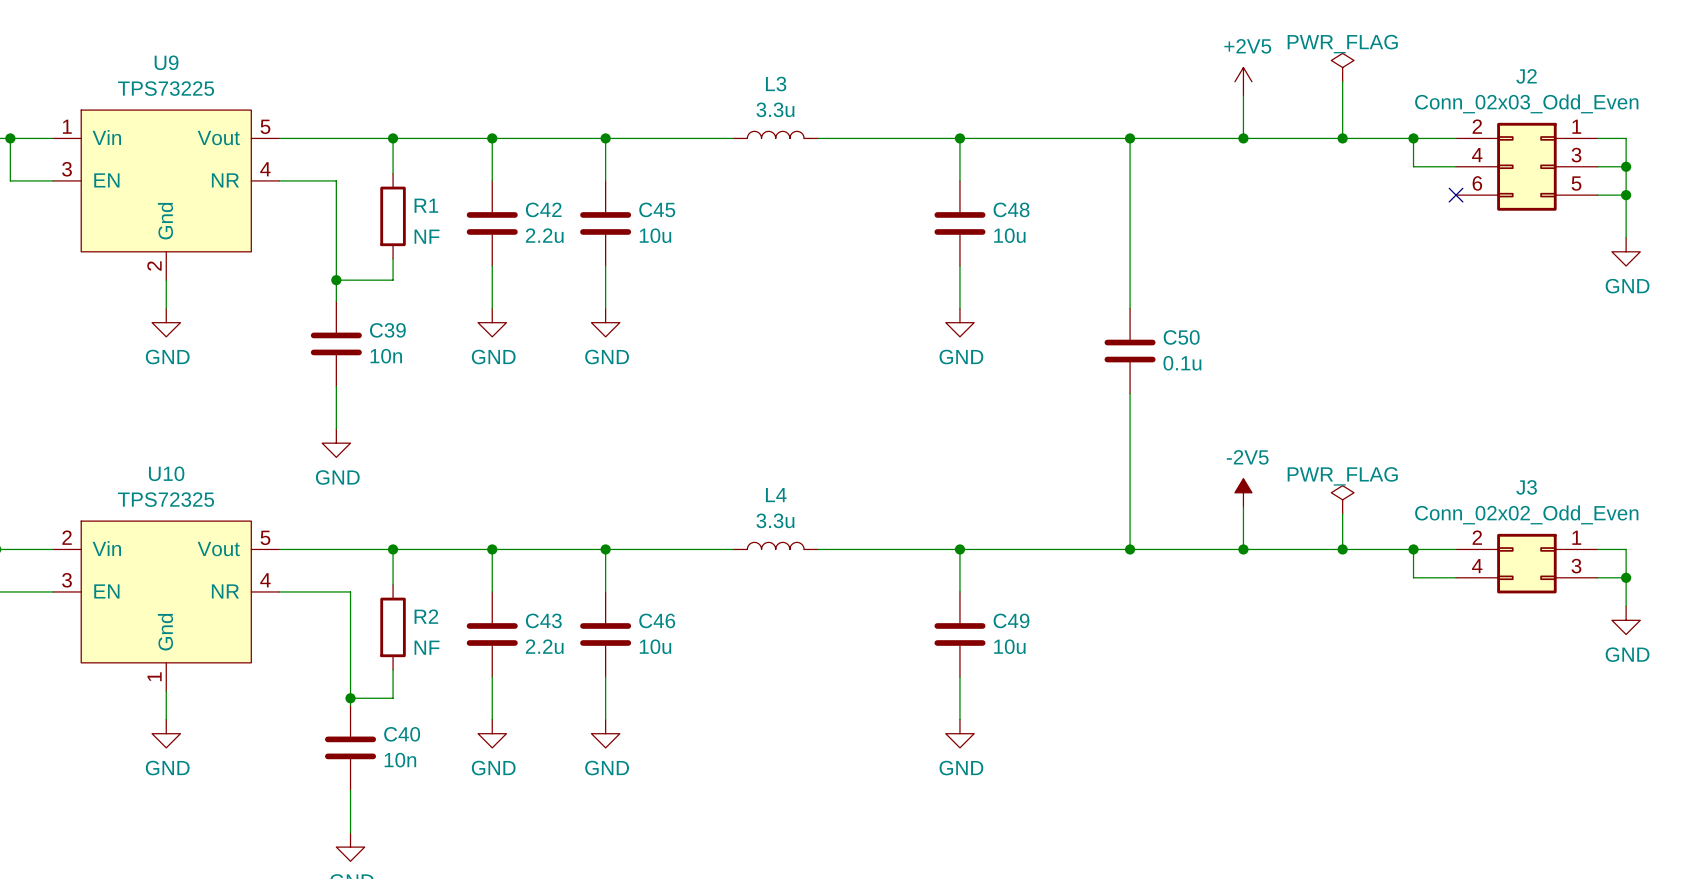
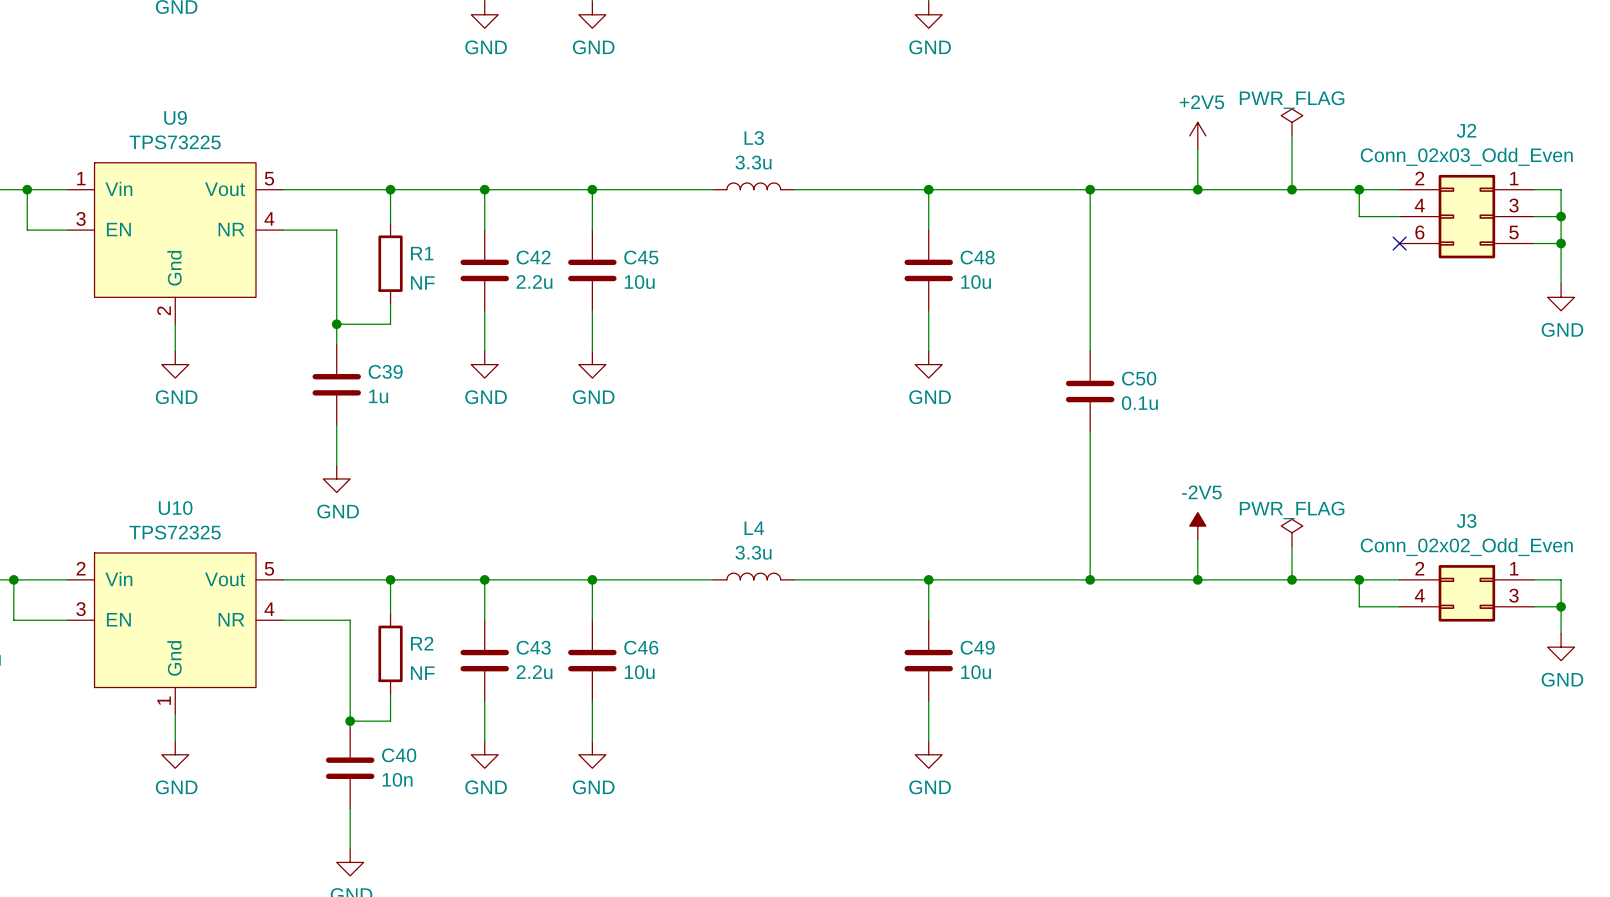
C39 value: 10n (386, 356) -> 1u (378, 396)

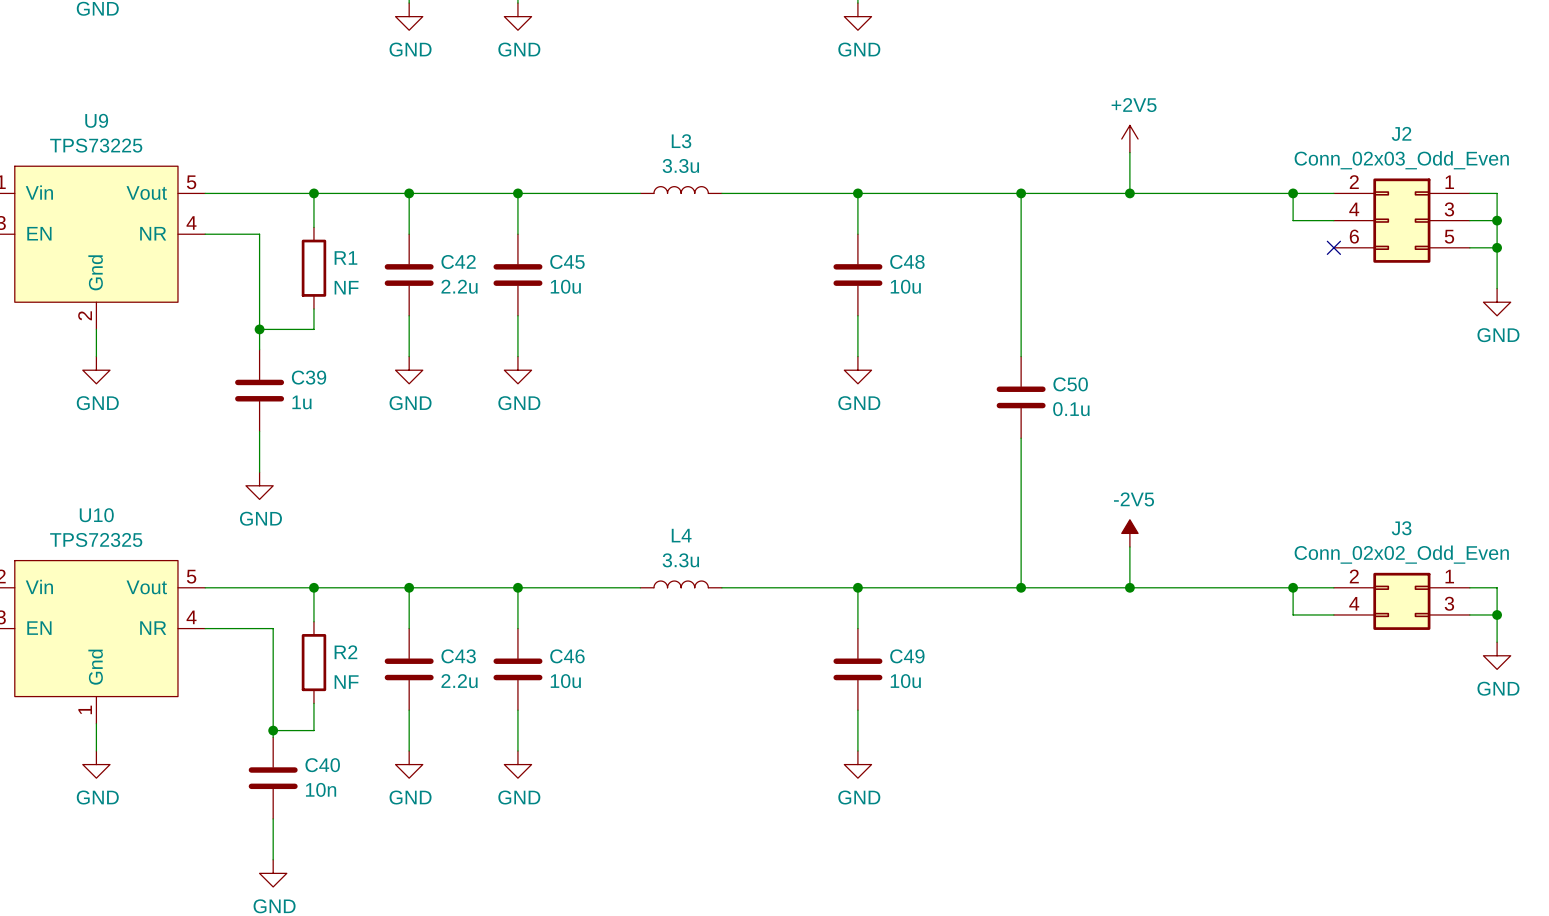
power symbol: PWR_FLAG (1291, 122) -> none
wire: (1291, 135) (1291, 189) -> none
junction: (1291, 189) -> none
power symbol: PWR_FLAG (1291, 532) -> none
wire: (1291, 546) (1291, 579) -> none
junction: (1291, 579) -> none

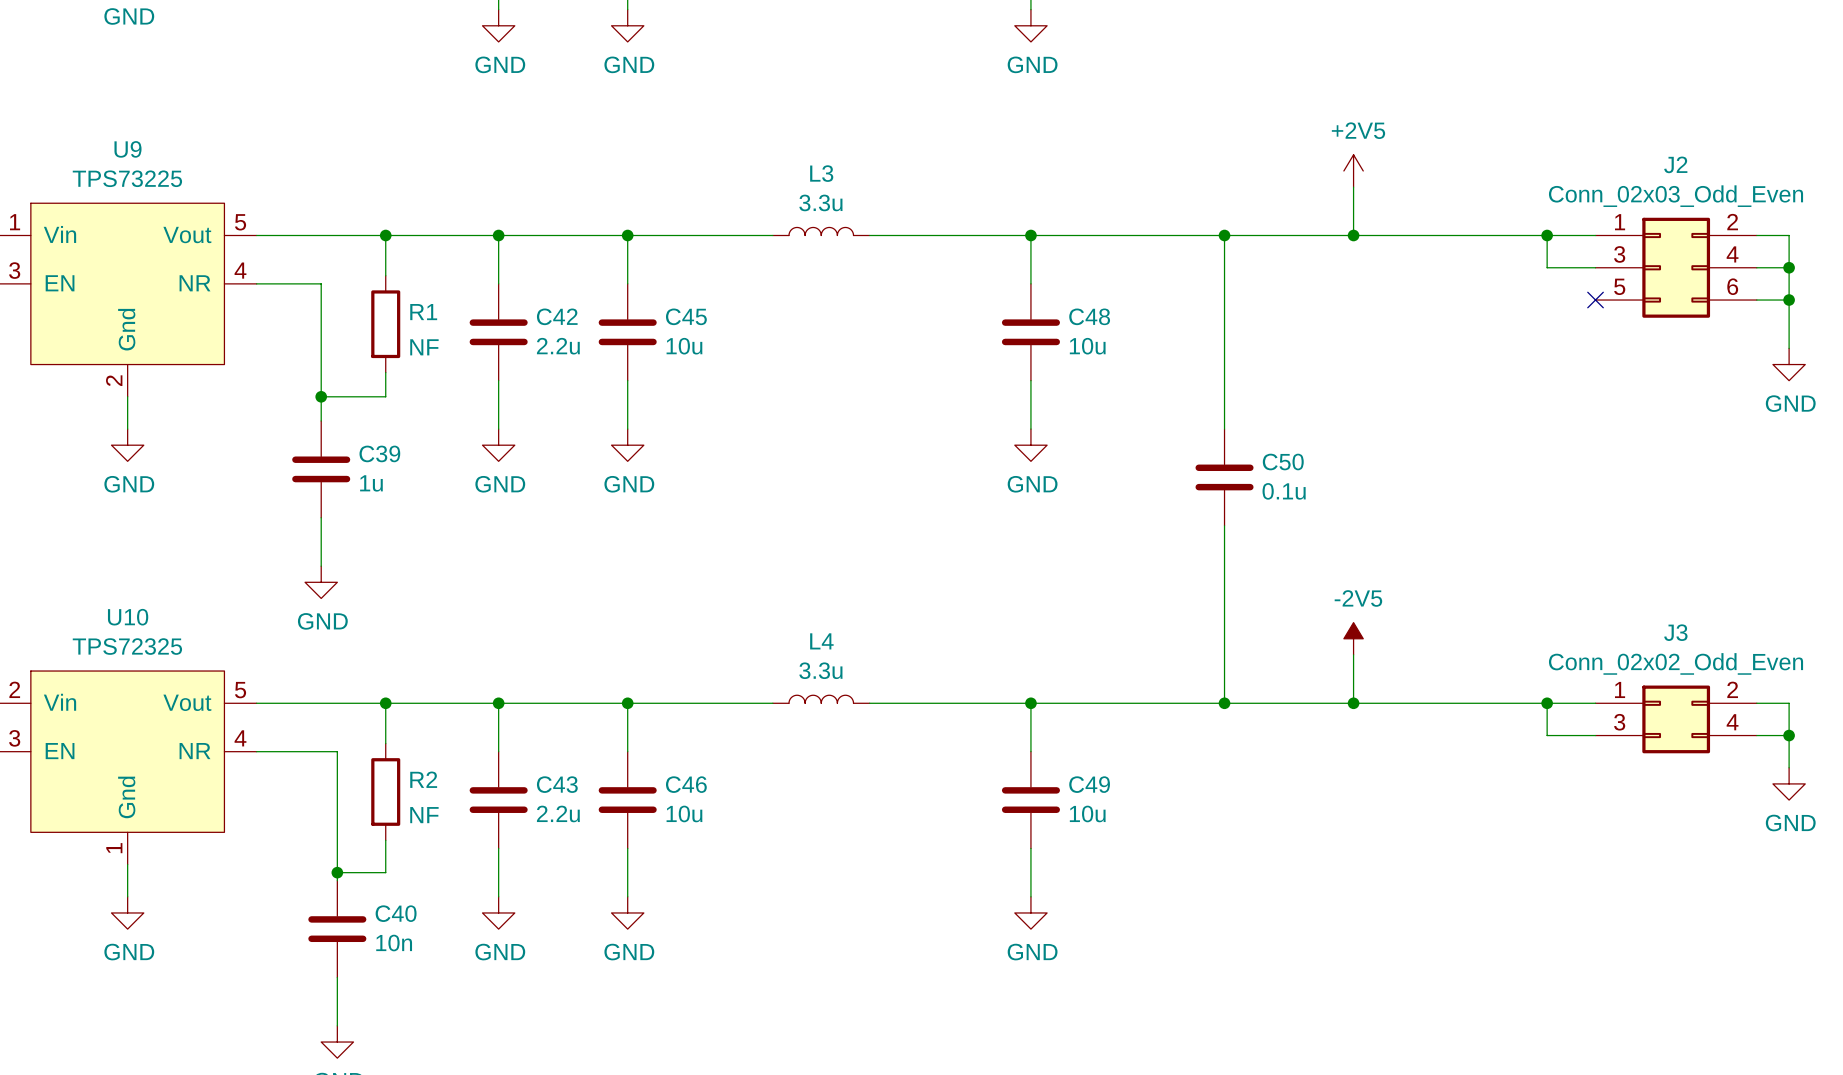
J2 flip: as is (1401, 220) -> left-right (1676, 267)
J3 flip: as is (1401, 601) -> left-right (1676, 719)

